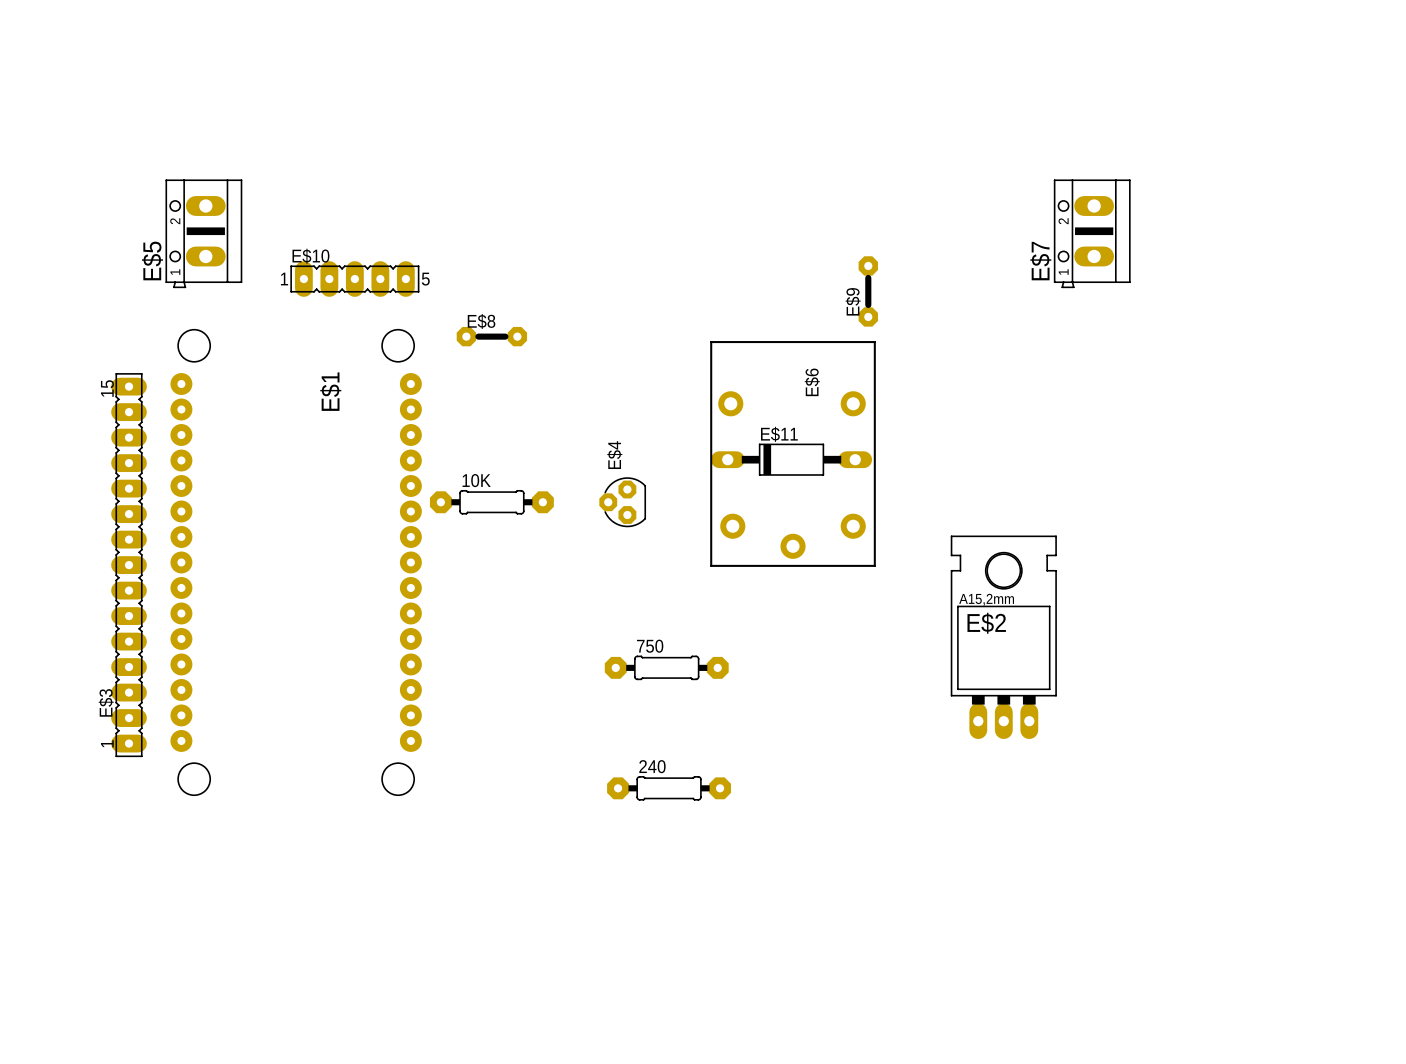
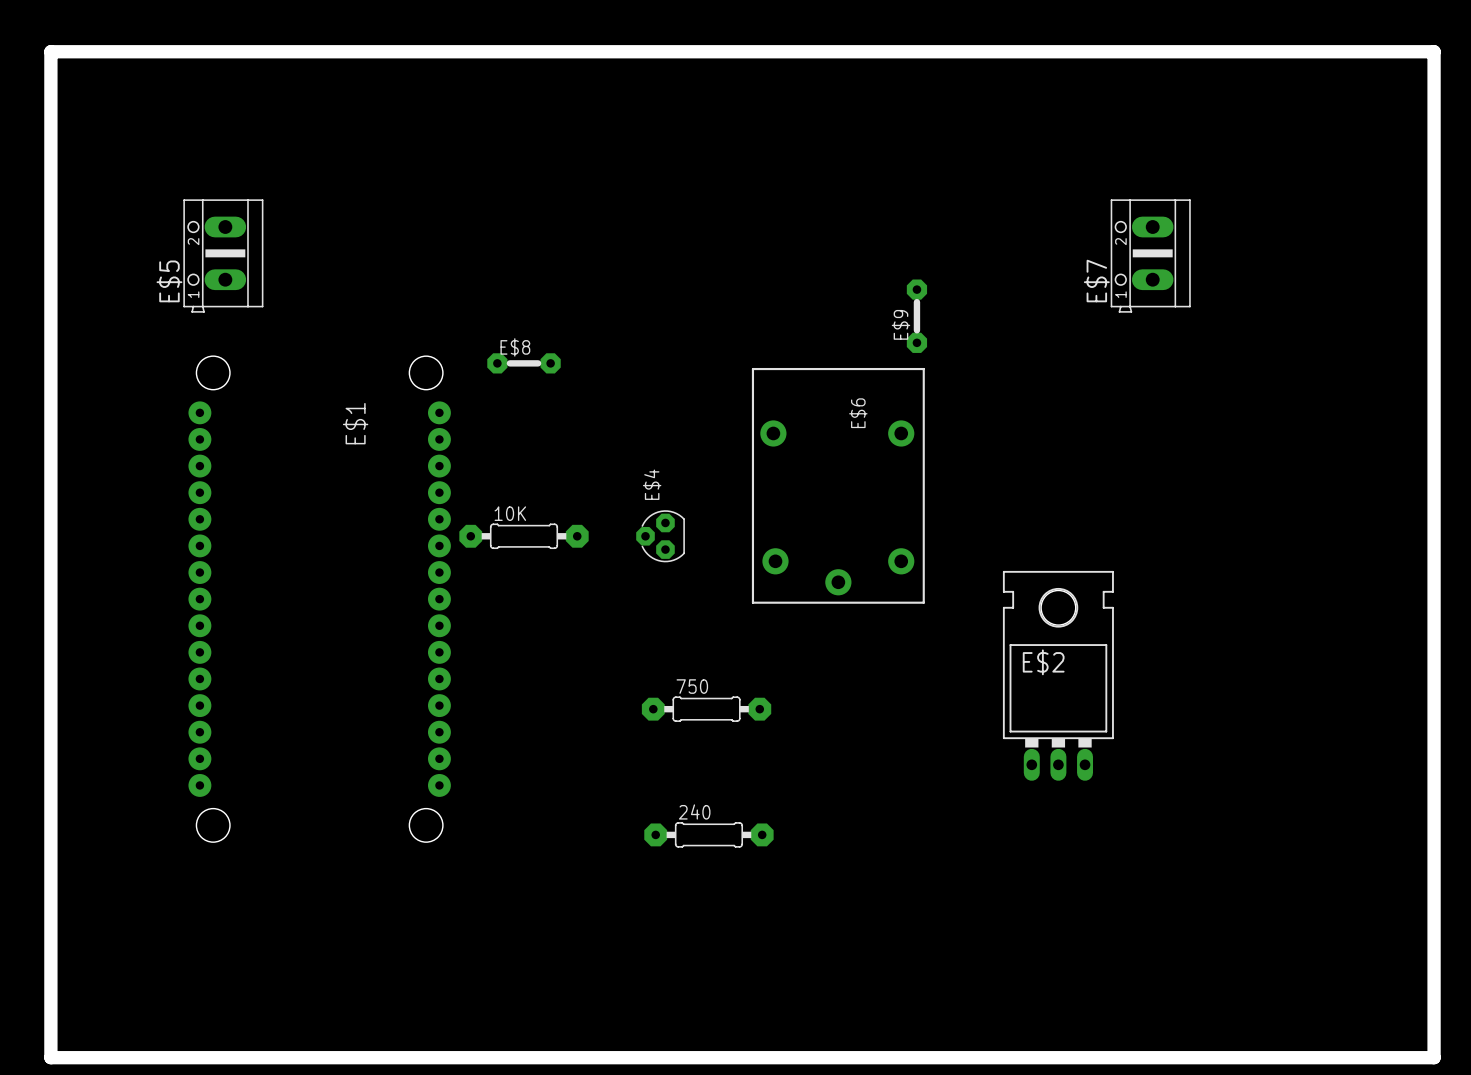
board edge: none -> (50, 51) (50, 1057) (1434, 1057) (1434, 51) (50, 51)
E$10: (354, 279) -> none
E$11: (791, 459) -> none
E$2 footprint: [950, 535, 1057, 740] -> [1002, 570, 1114, 781]
E$3: (129, 565) -> none

